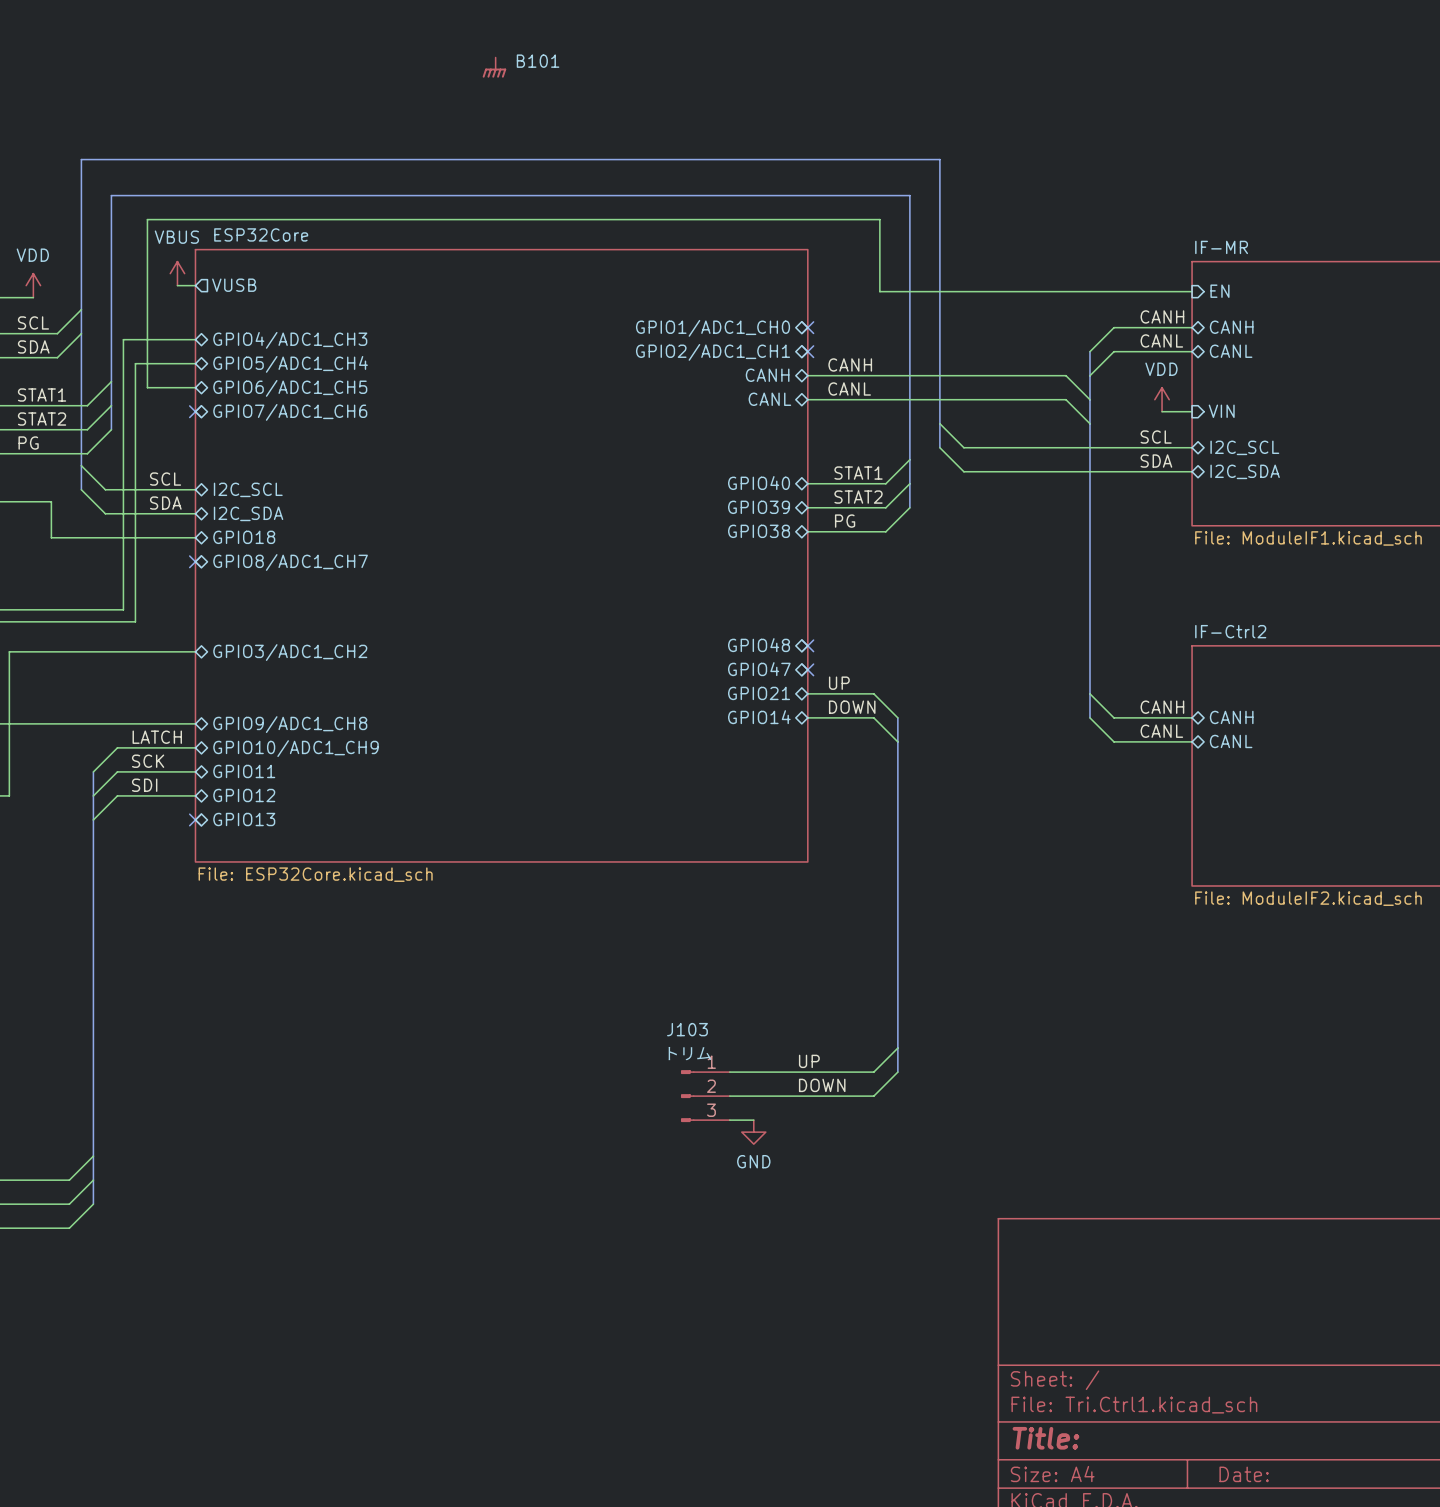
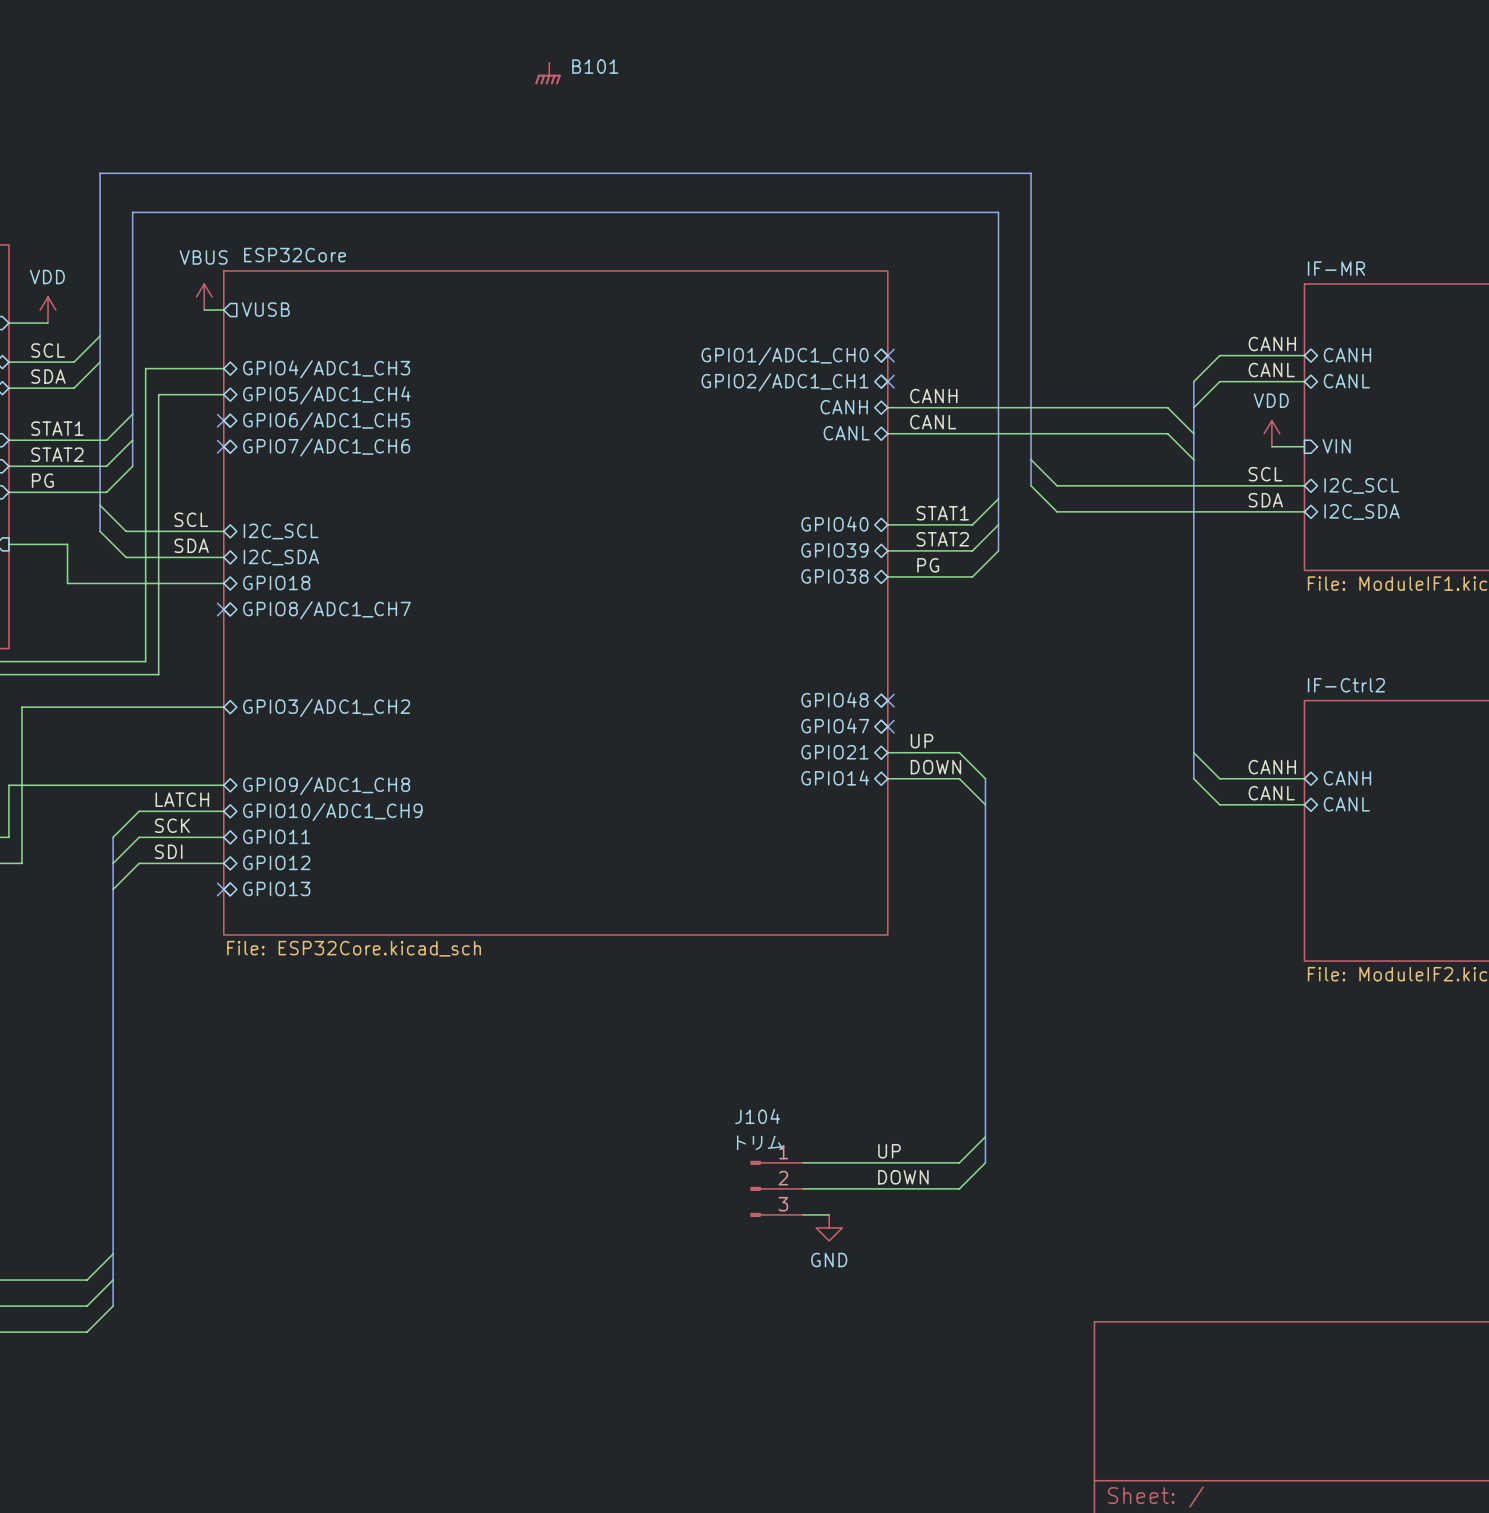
wire: (1192, 291) (879, 291) (879, 219) (147, 219) (147, 387) (195, 387) -> none
sheet pin: EN (1219, 291) -> none
no-connect mark: none -> (223, 420)
J103 name: J103 (687, 1029) -> J104 (757, 1116)

